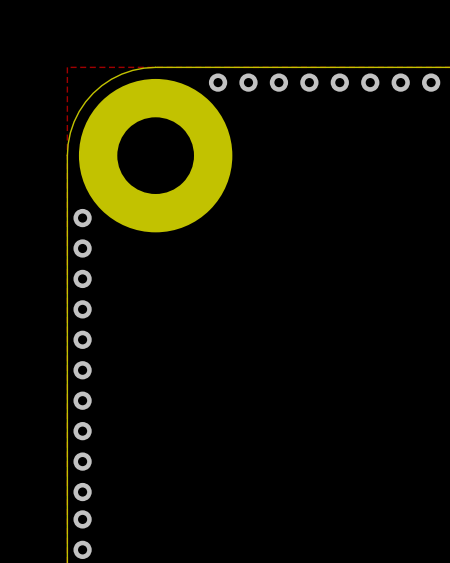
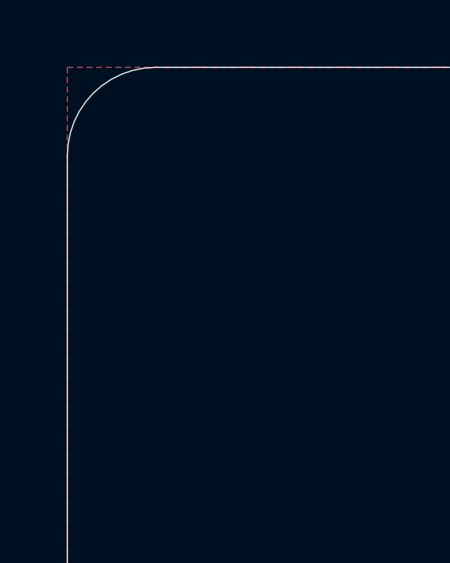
via: (218, 82) -> none
via: (248, 82) -> none
via: (278, 82) -> none
via: (309, 82) -> none
via: (339, 82) -> none
via: (370, 82) -> none
via: (400, 82) -> none
via: (431, 82) -> none
part: (155, 155) -> none
via: (82, 218) -> none
via: (82, 248) -> none
via: (82, 278) -> none
via: (82, 309) -> none
via: (82, 339) -> none
via: (82, 370) -> none
via: (82, 400) -> none
via: (82, 431) -> none
via: (82, 461) -> none
via: (82, 492) -> none
via: (82, 519) -> none
via: (82, 549) -> none

